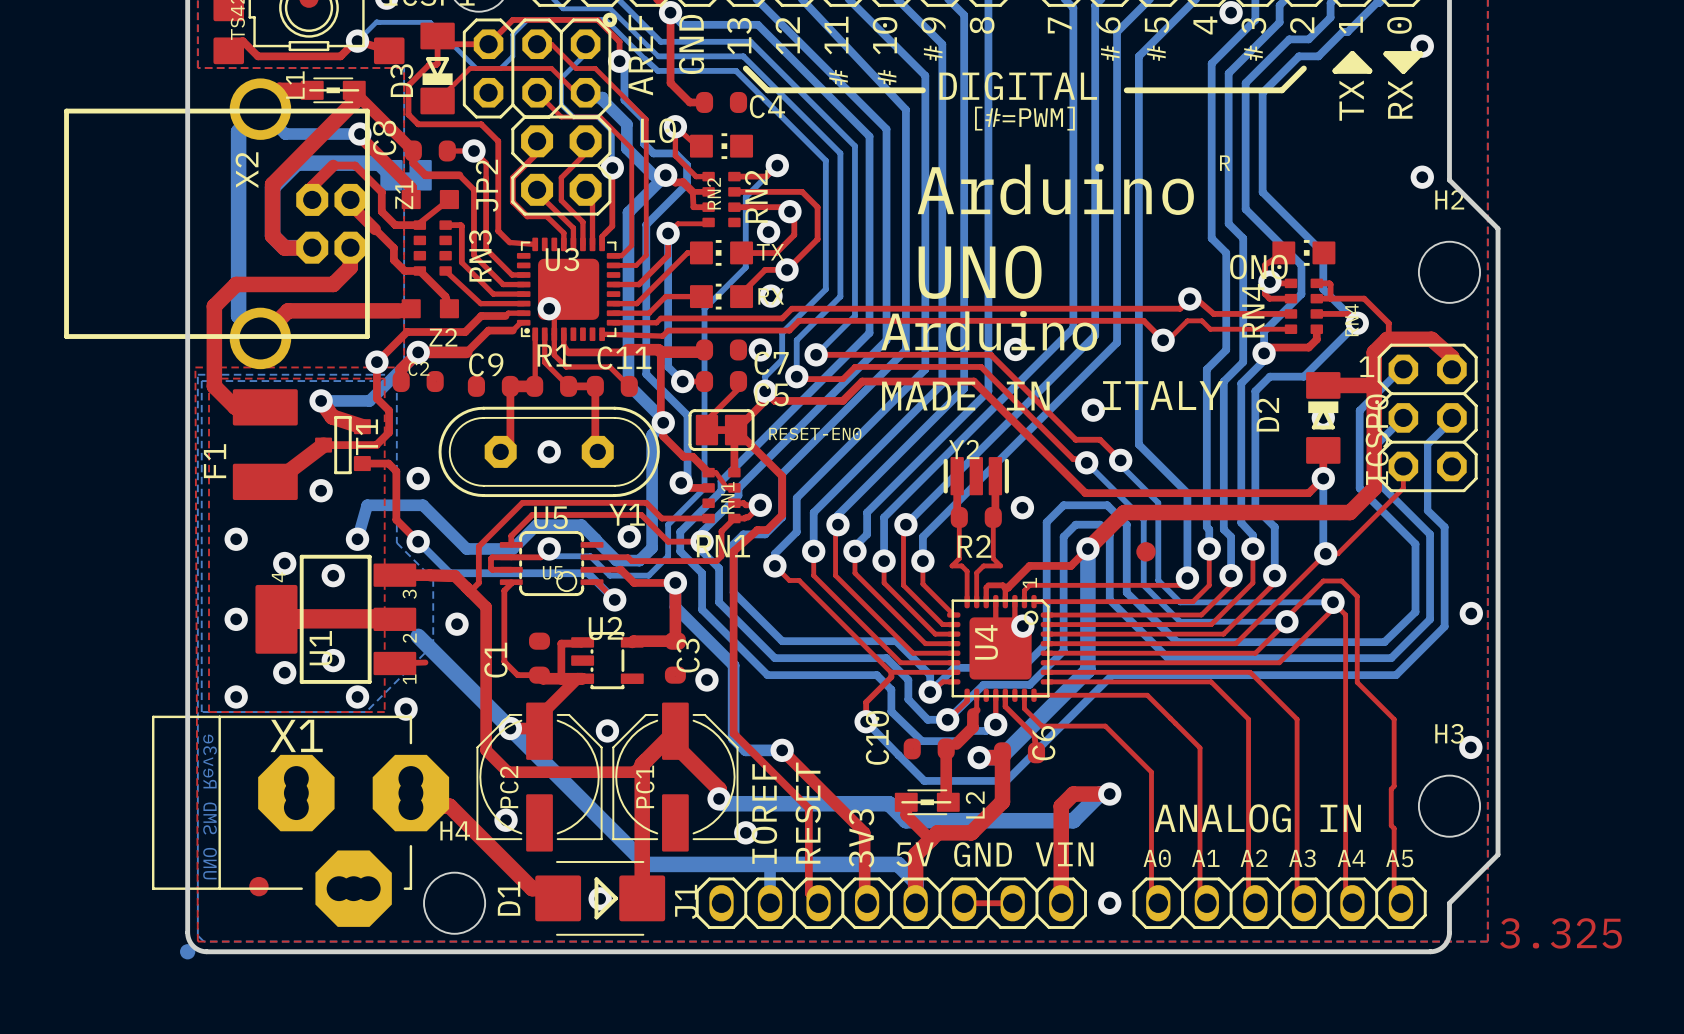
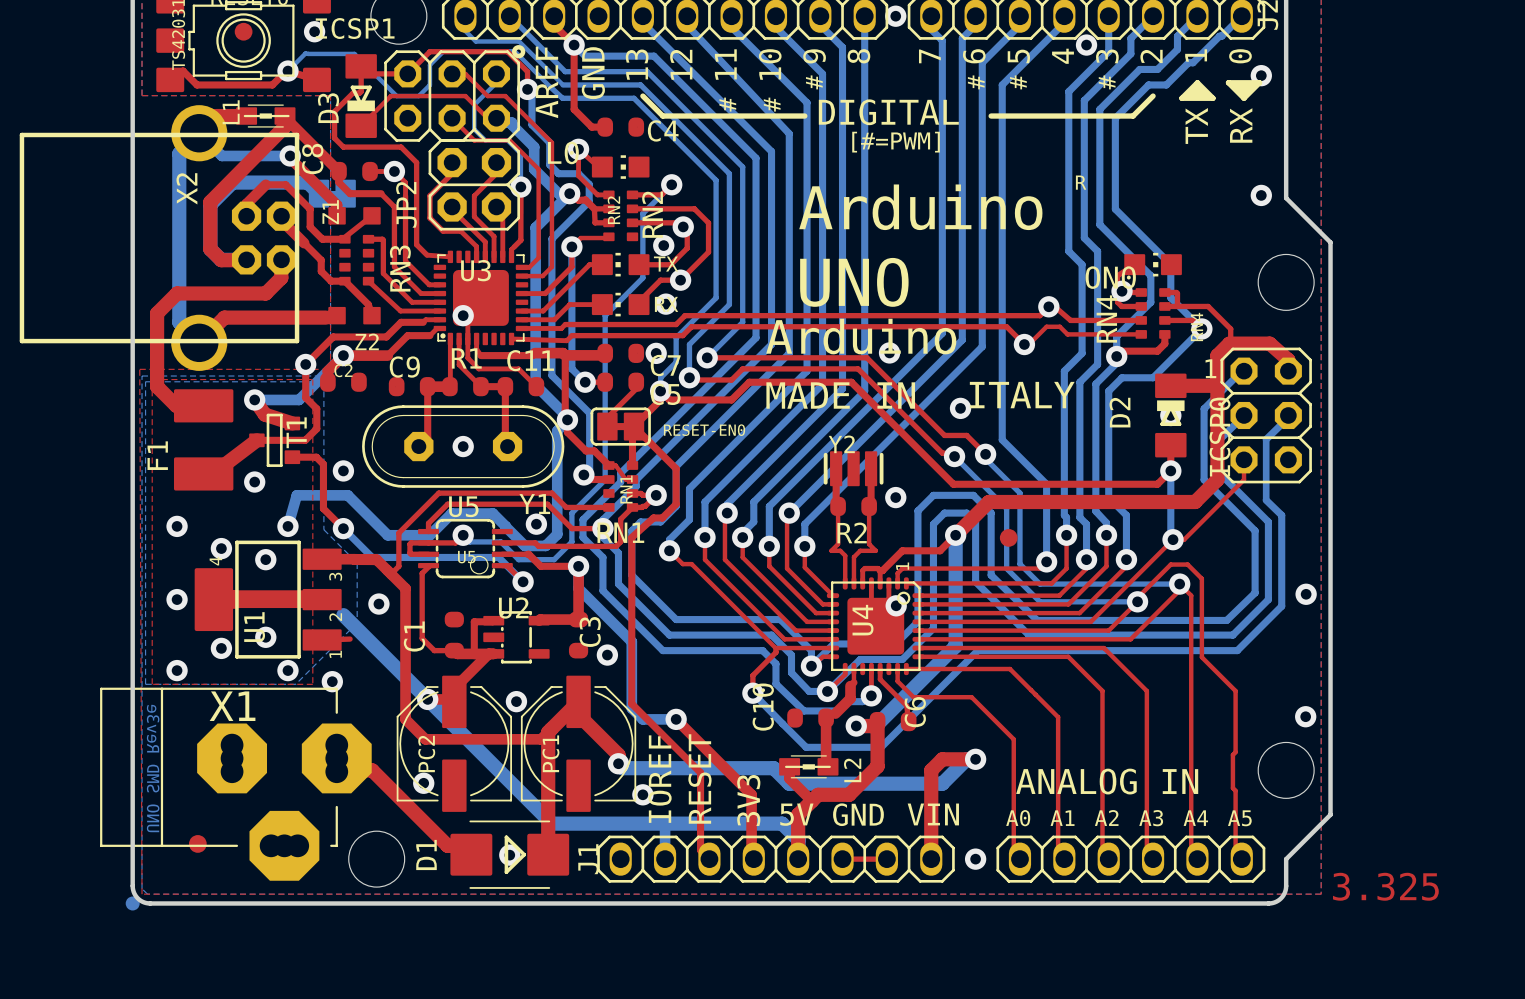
H2 name: H2 (1449, 199) -> none
H3 name: H3 (1449, 733) -> none
H4 name: H4 (455, 830) -> none

